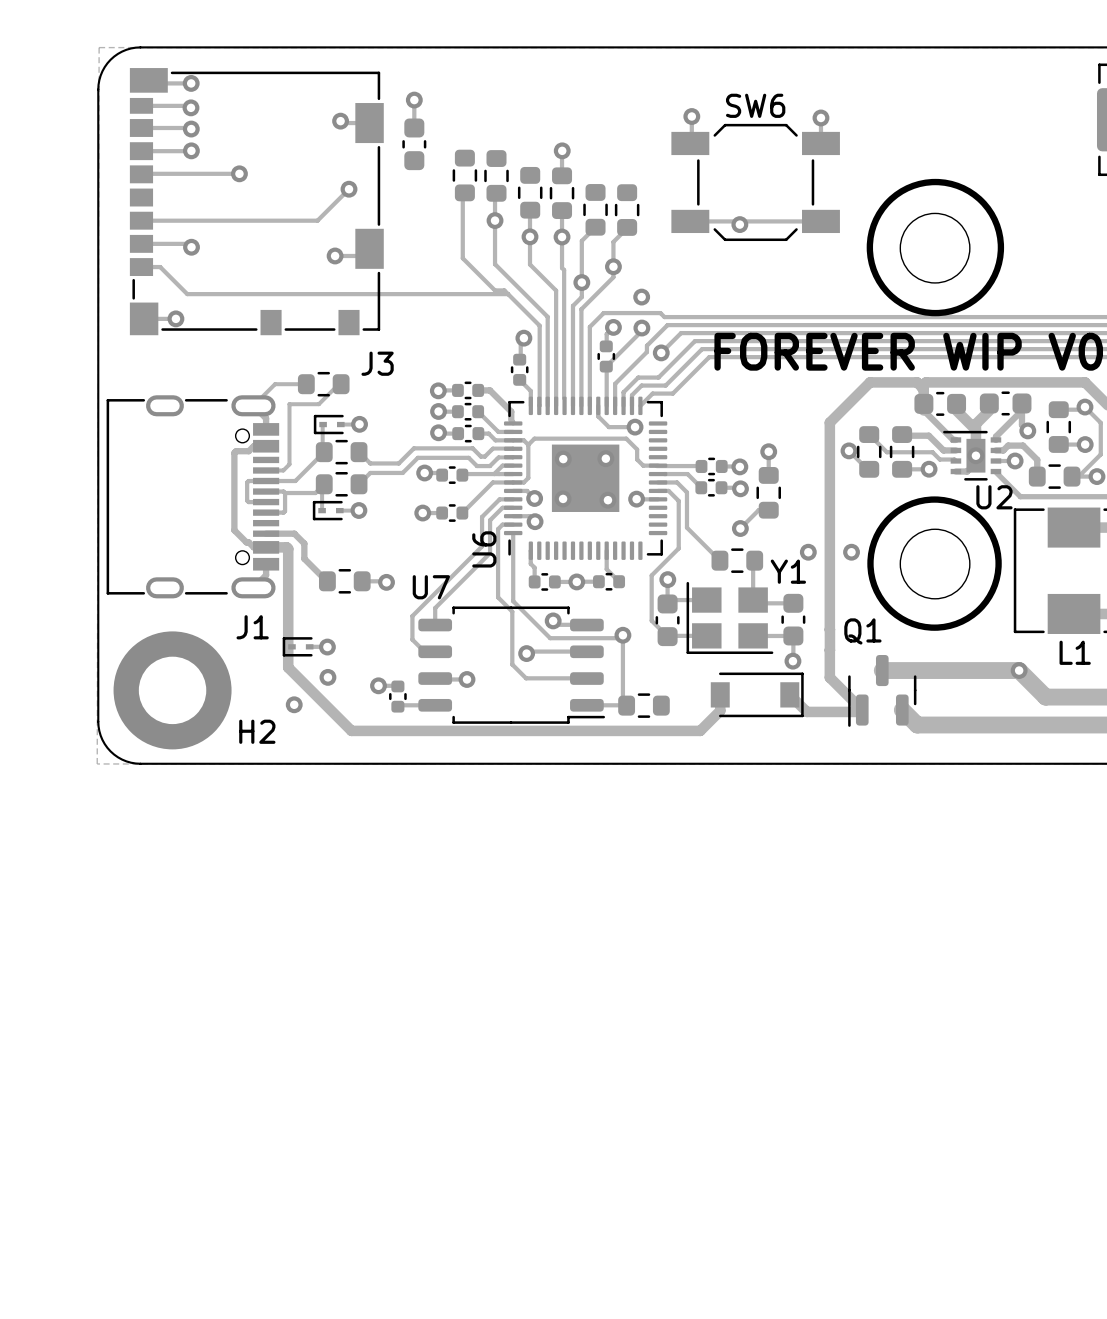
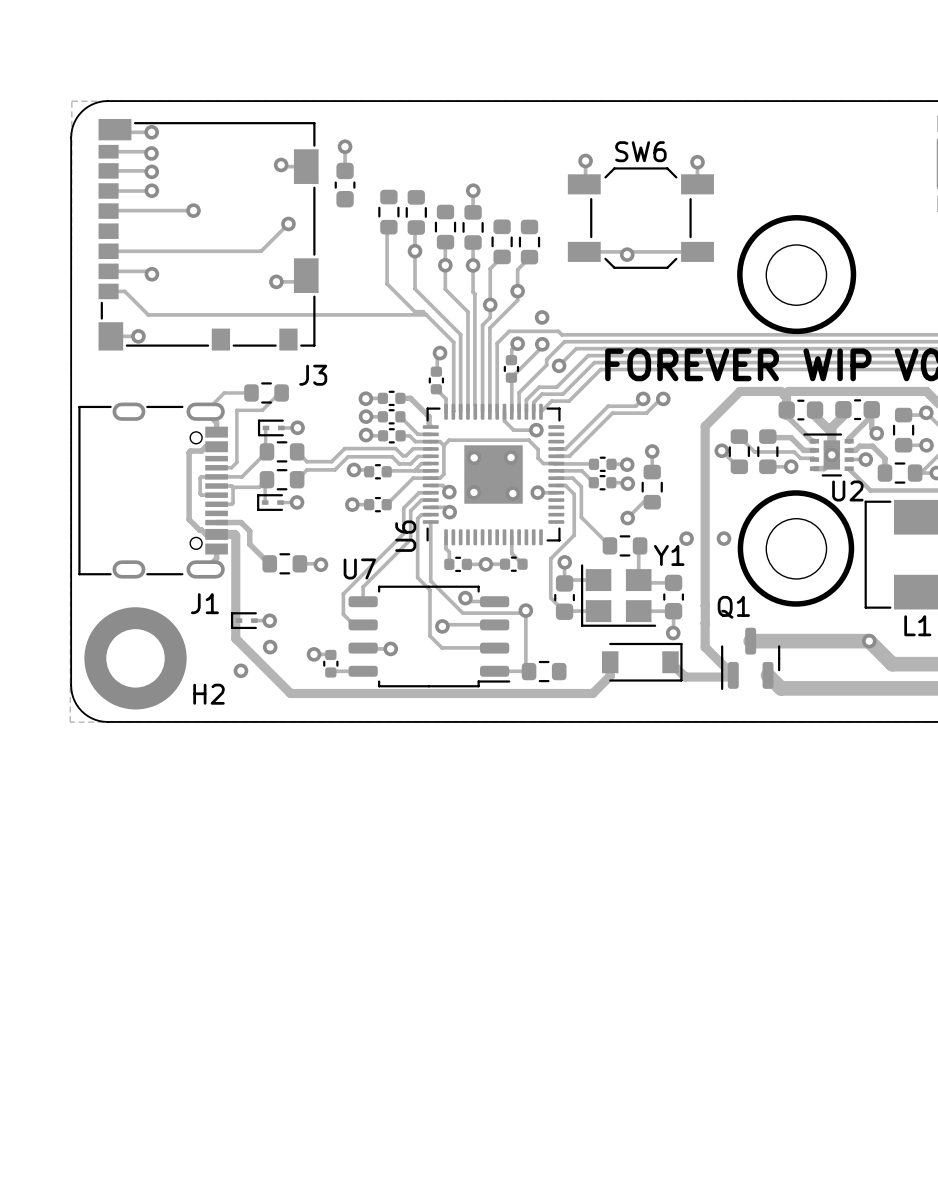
track: none -> (643, 398) (635, 406) (608, 406) (565, 448) (556, 448)
via: none -> (643, 398)
track: none -> (663, 398) (660, 398) (646, 413) (612, 413) (569, 456) (556, 456)
via: none -> (663, 398)

